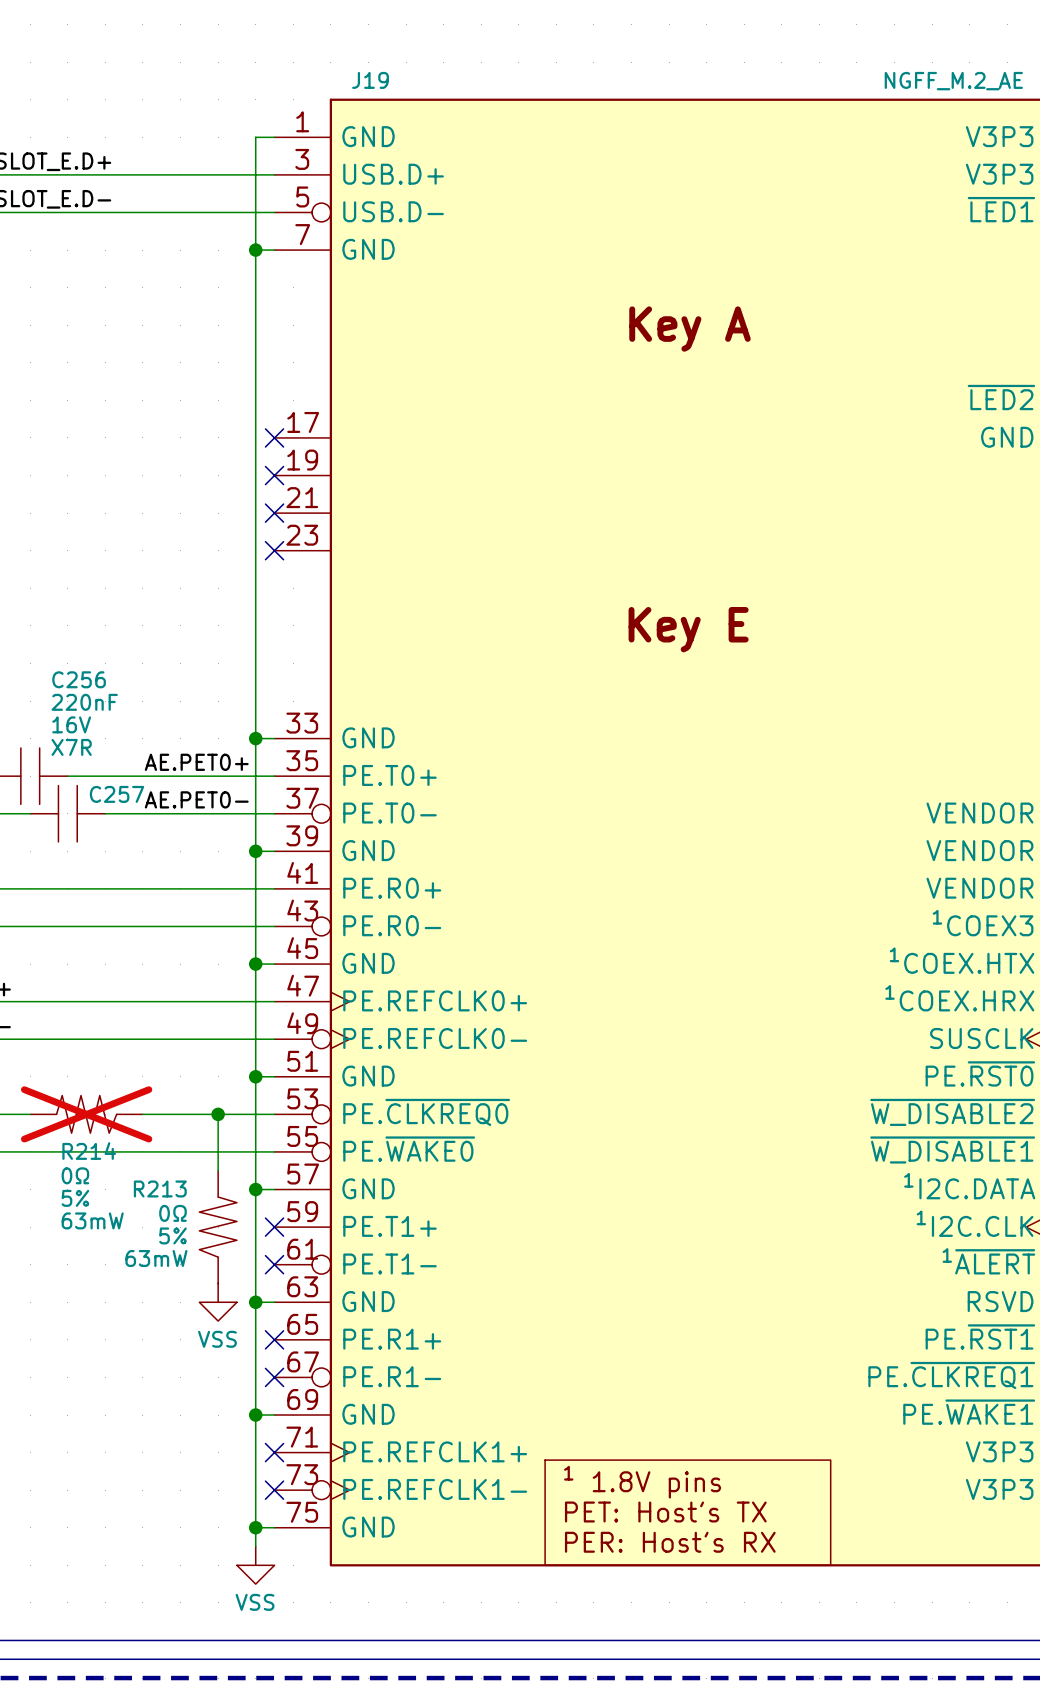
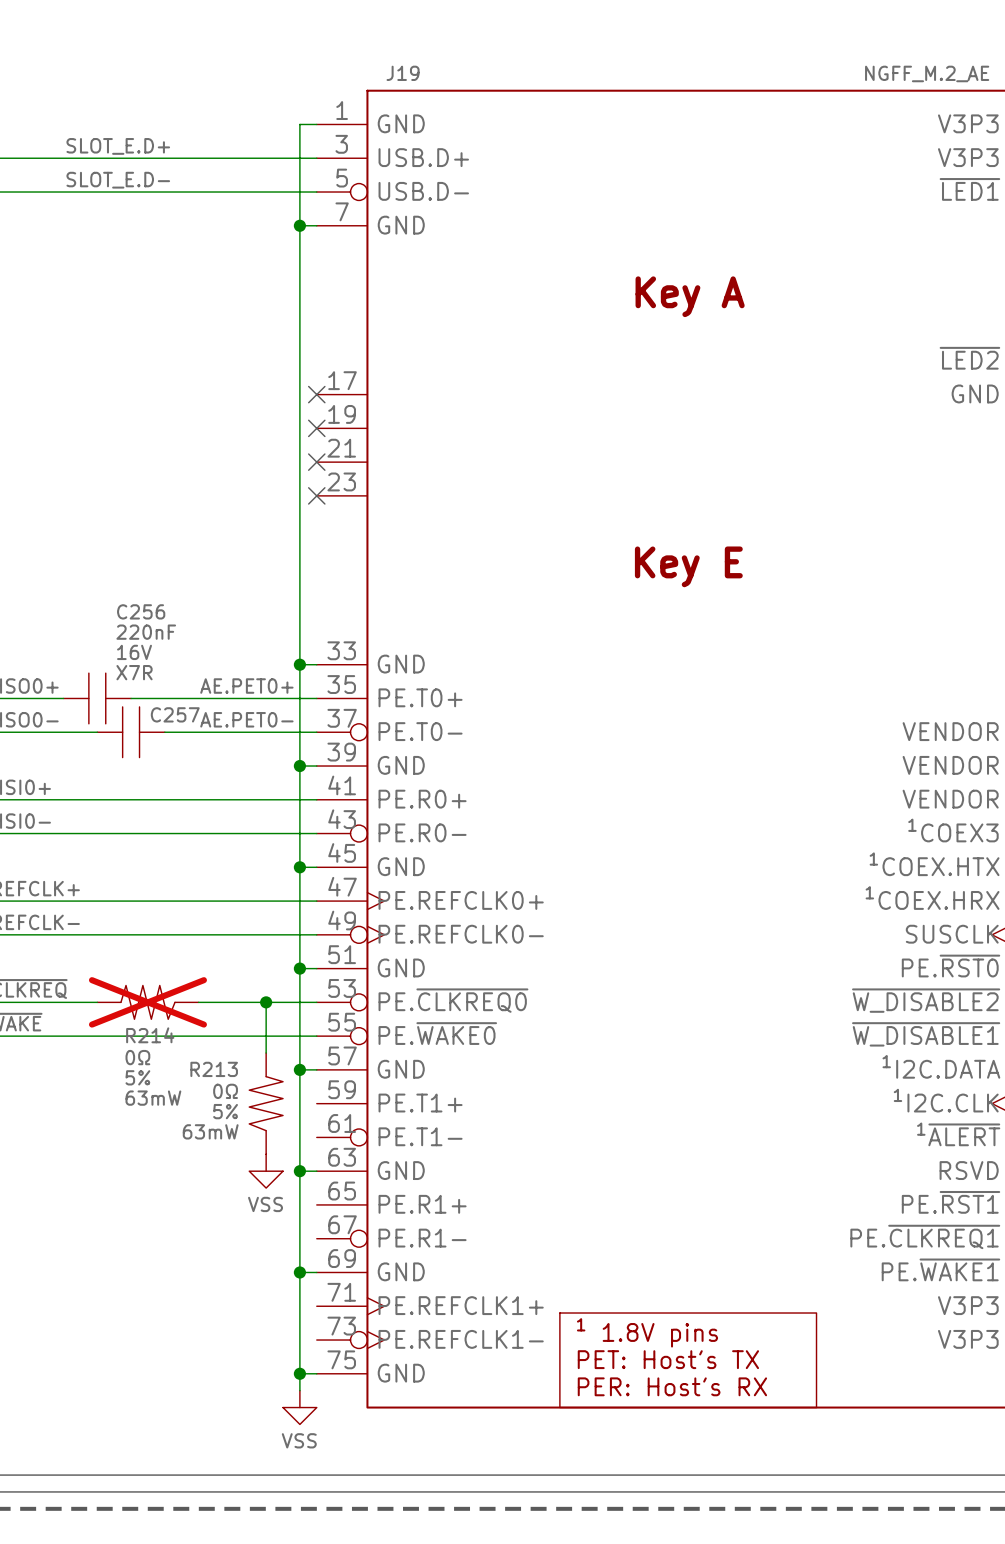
no-connect mark: (274, 1227) -> none
no-connect mark: (274, 1264) -> none
no-connect mark: (274, 1339) -> none
no-connect mark: (274, 1377) -> none
no-connect mark: (274, 1452) -> none
no-connect mark: (274, 1490) -> none

